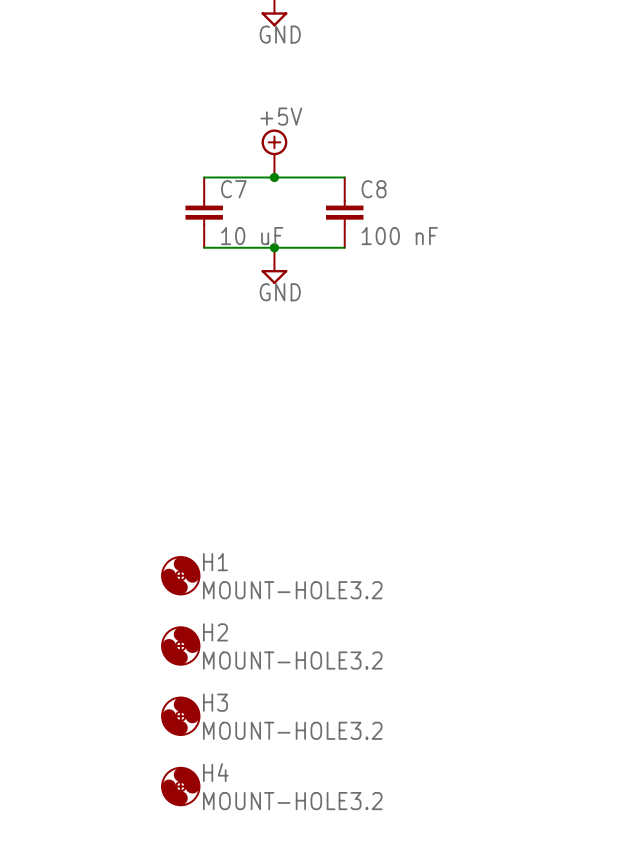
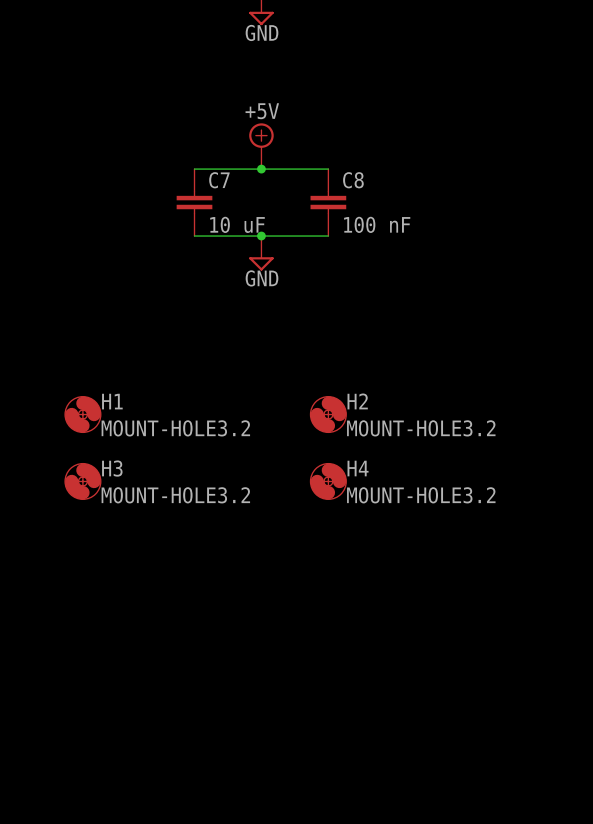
H1 position: (180, 575) -> (82, 414)
H2 position: (180, 645) -> (328, 414)
H3 position: (180, 716) -> (82, 481)
H4 position: (180, 786) -> (328, 481)

